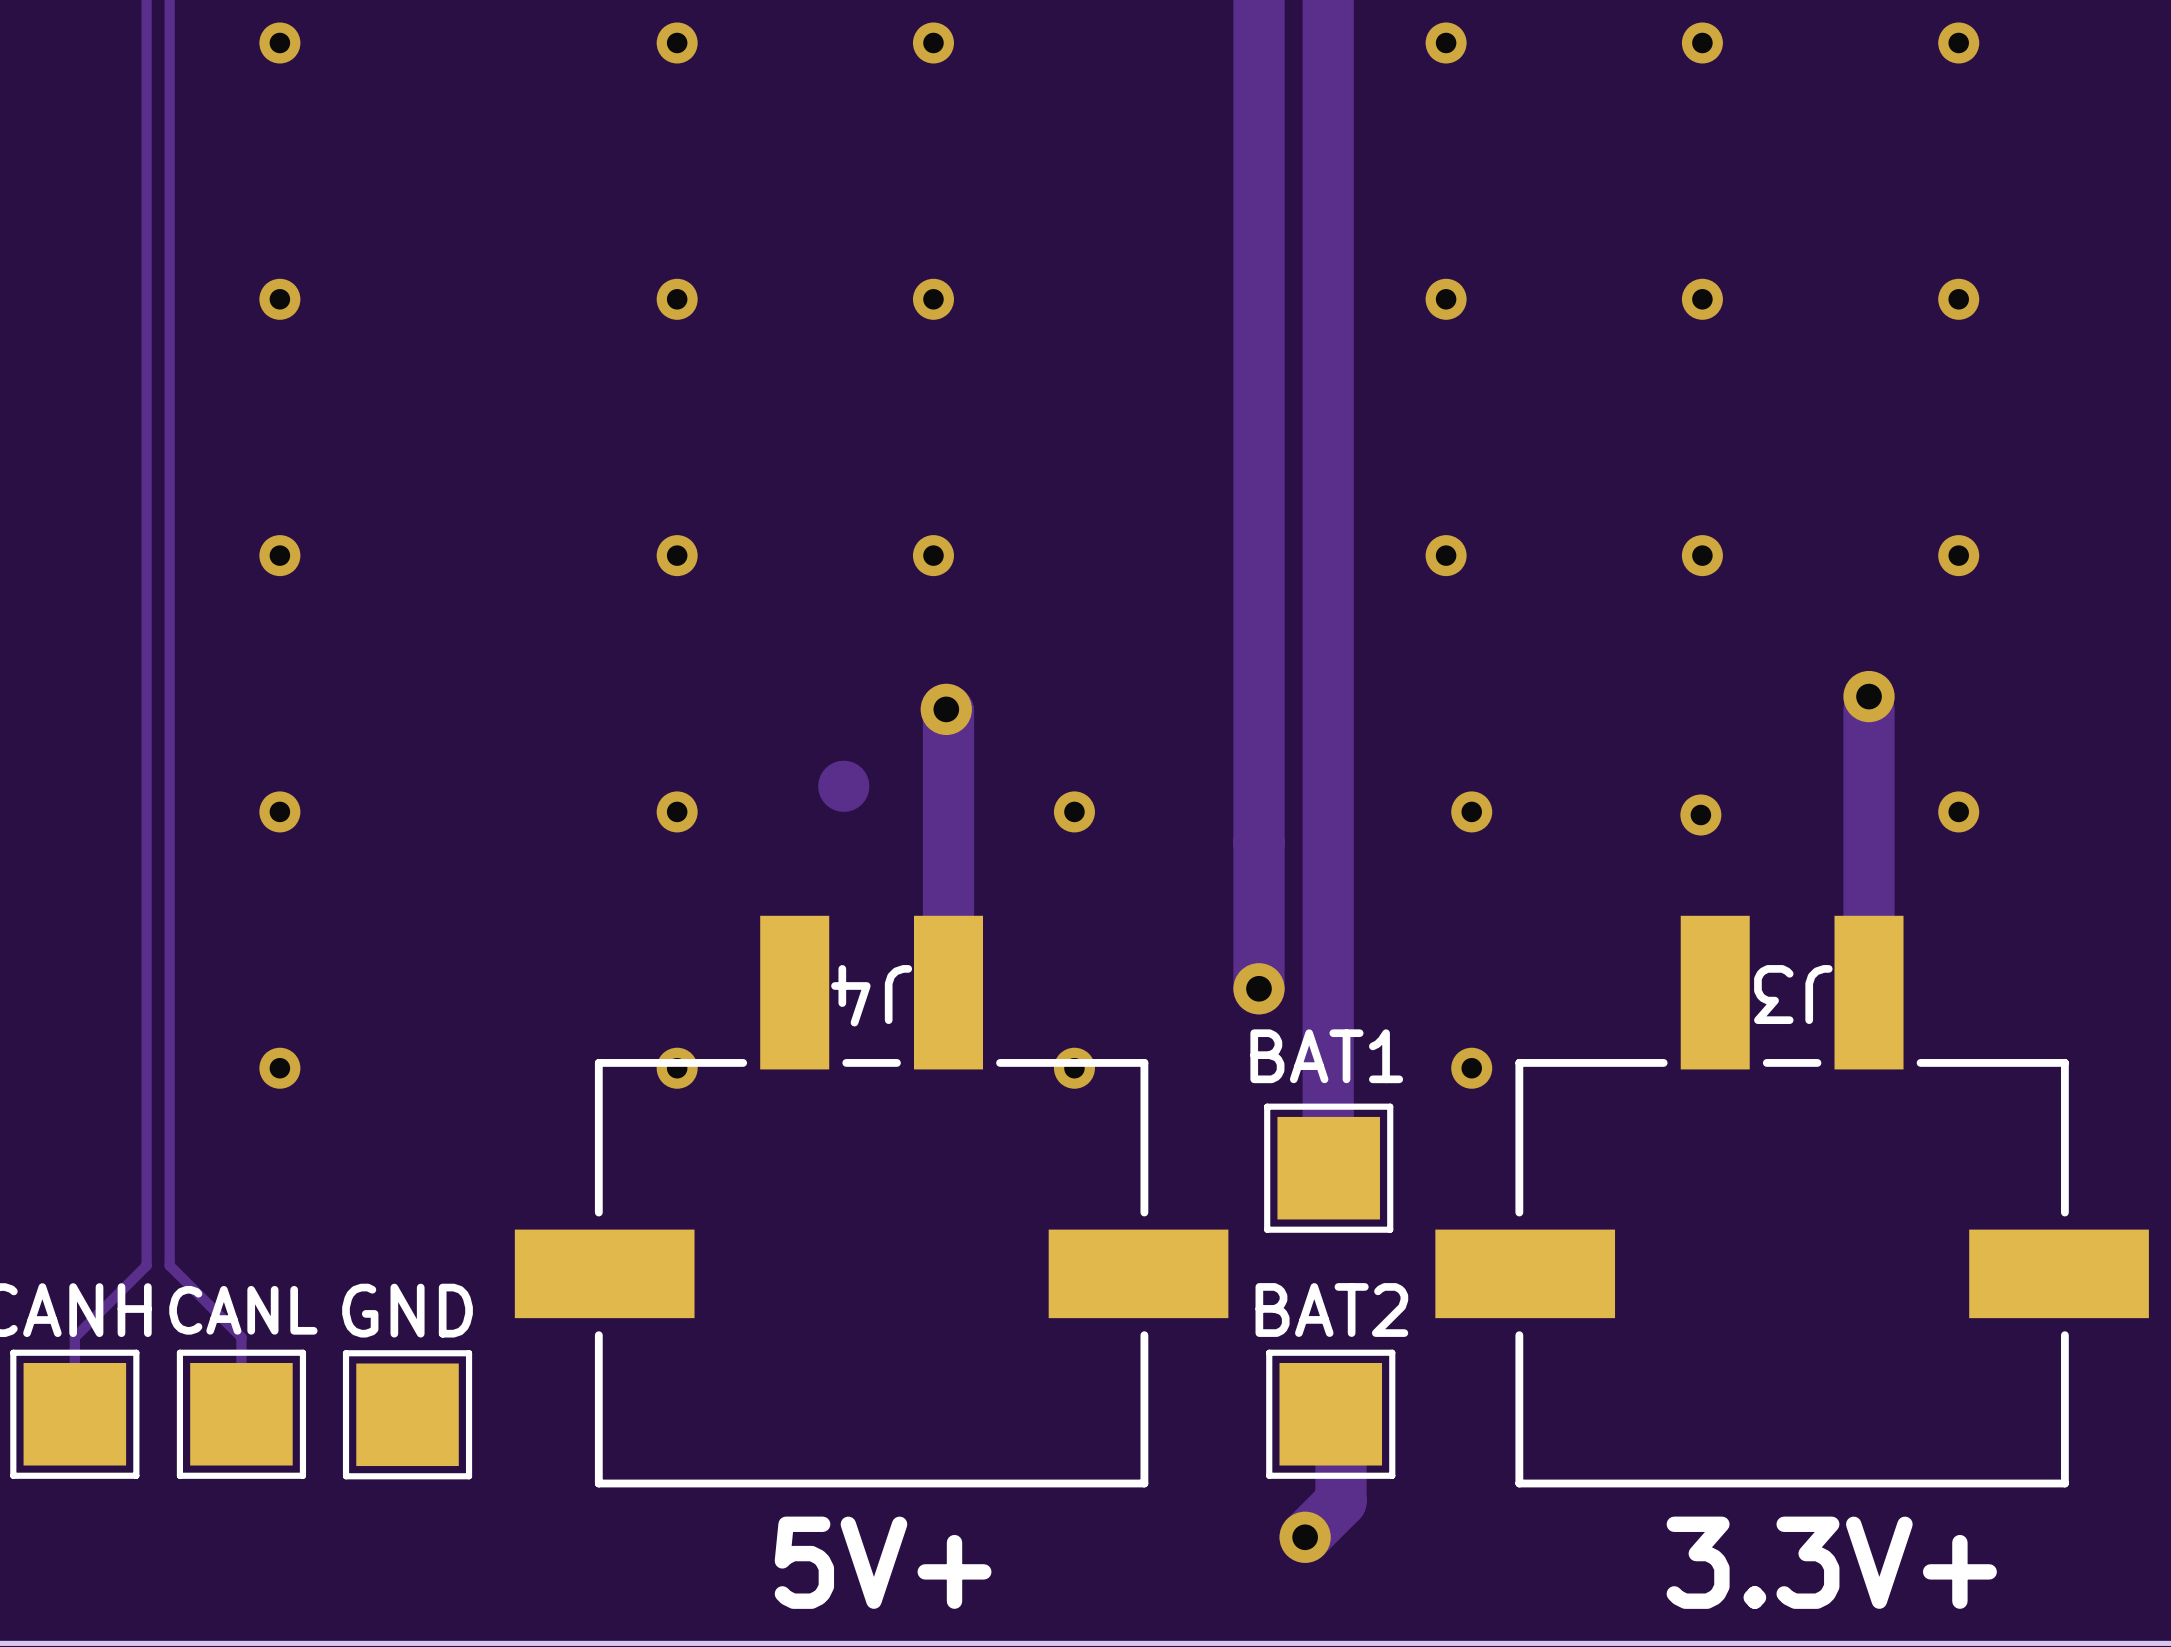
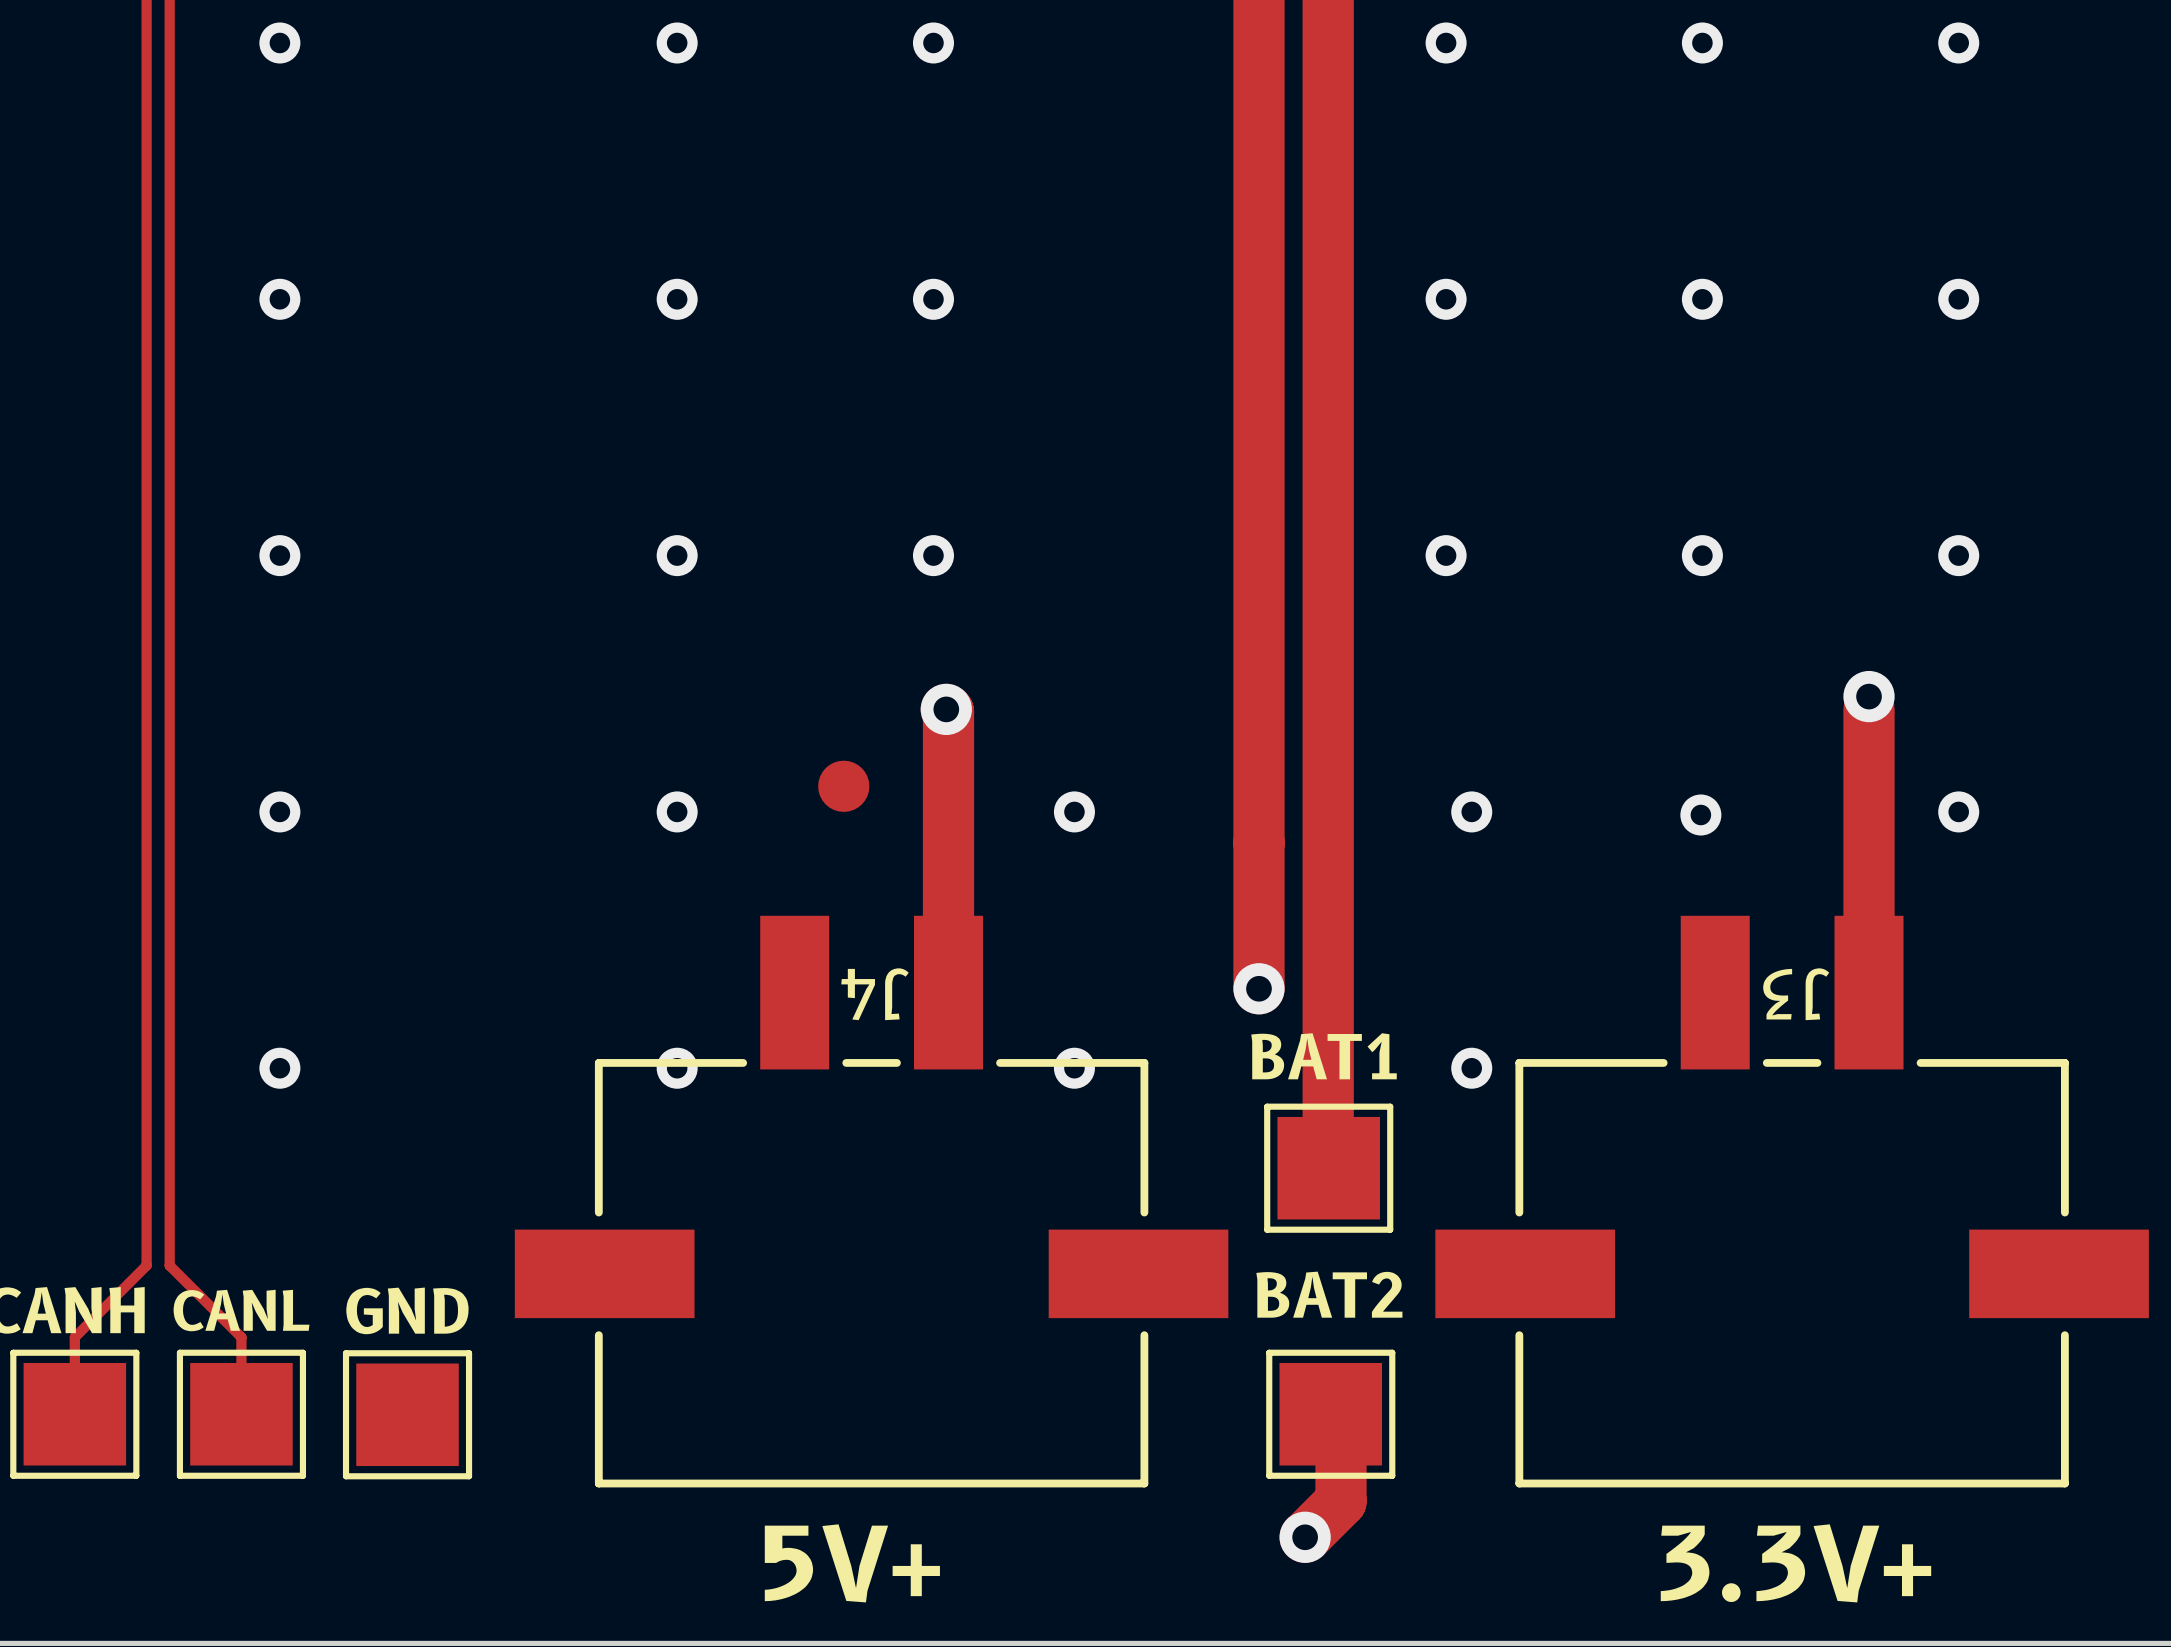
BAT2 name position: BAT2 (1331, 1310) -> BAT2 (1329, 1294)

